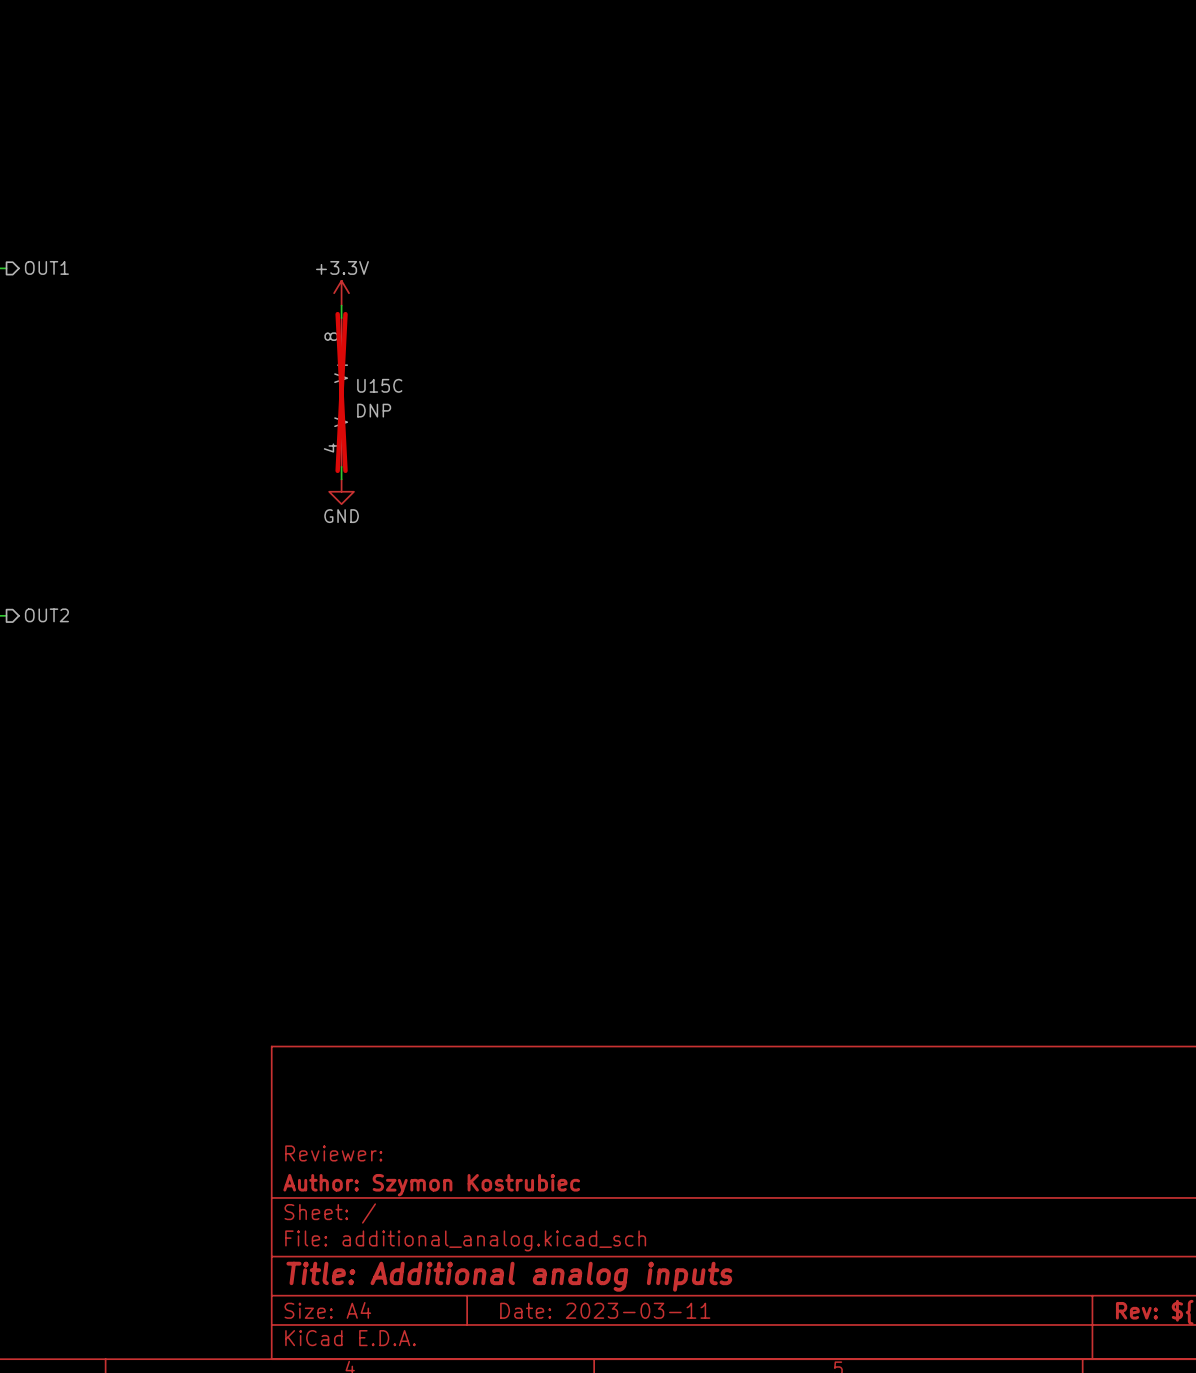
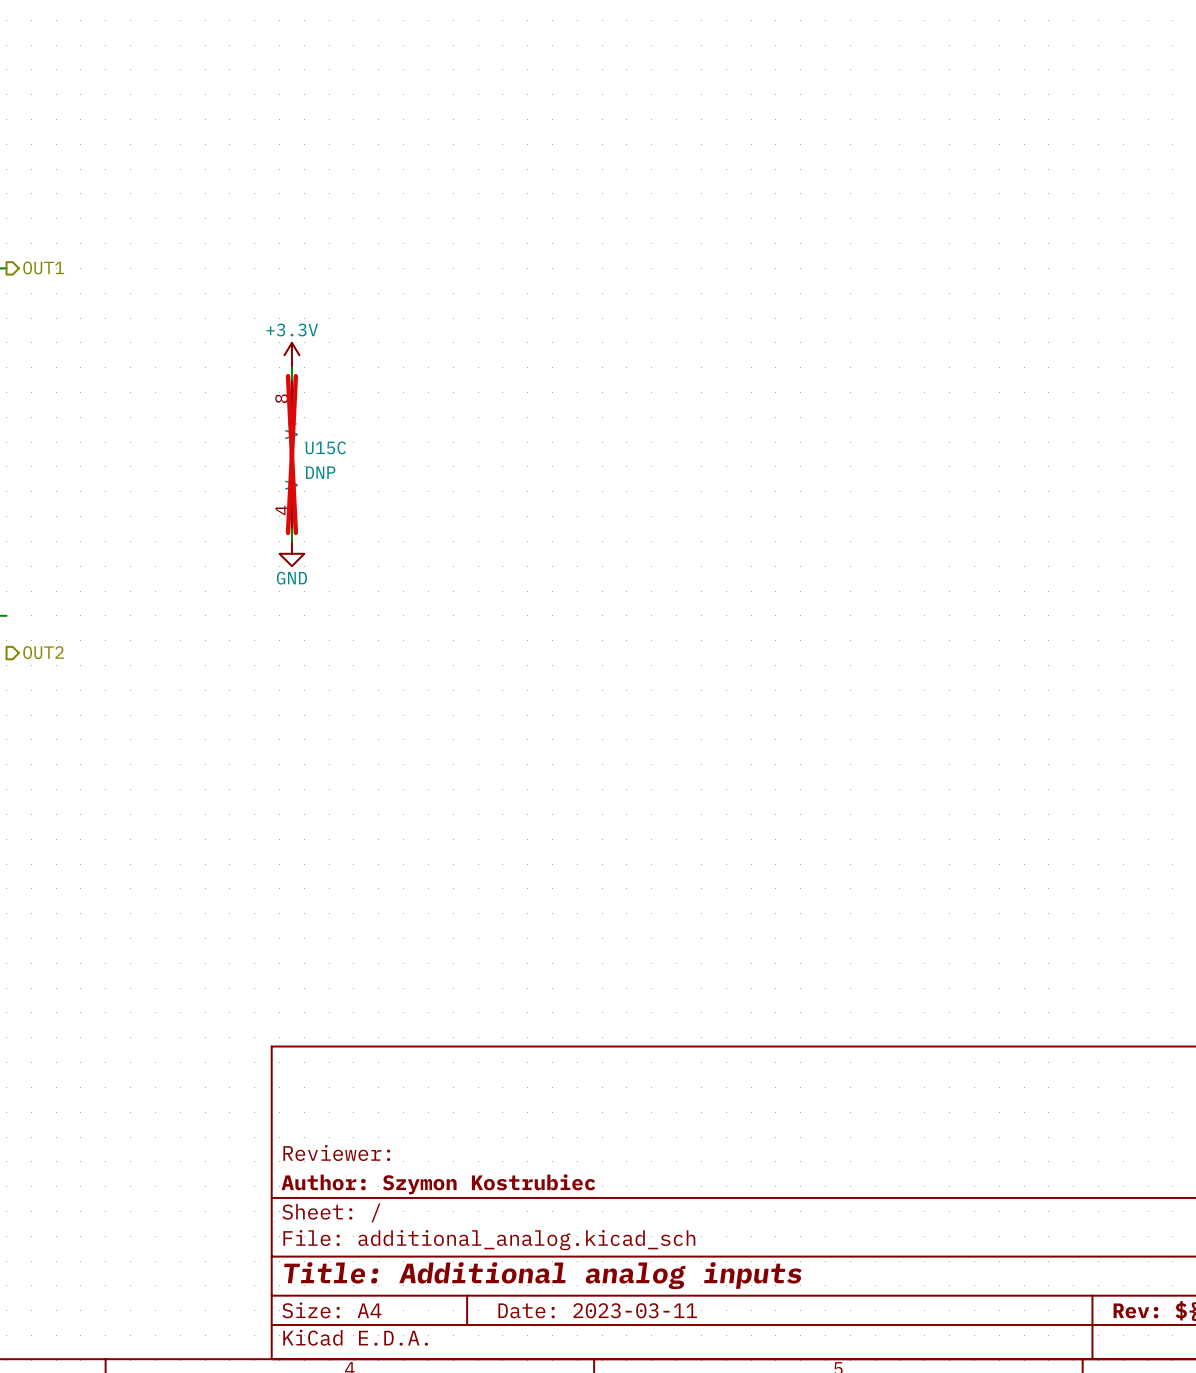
power symbol position: +3.3V (341, 293) -> +3.3V (291, 355)
wire: (341, 305) (341, 318) -> (291, 367) (291, 380)
U15C position: (341, 392) -> (291, 454)
wire: (341, 466) (341, 479) -> (291, 528) (291, 541)
power symbol position: GND (341, 491) -> GND (291, 553)
hierarchical label position: OUT2 (46, 615) -> OUT2 (43, 652)

